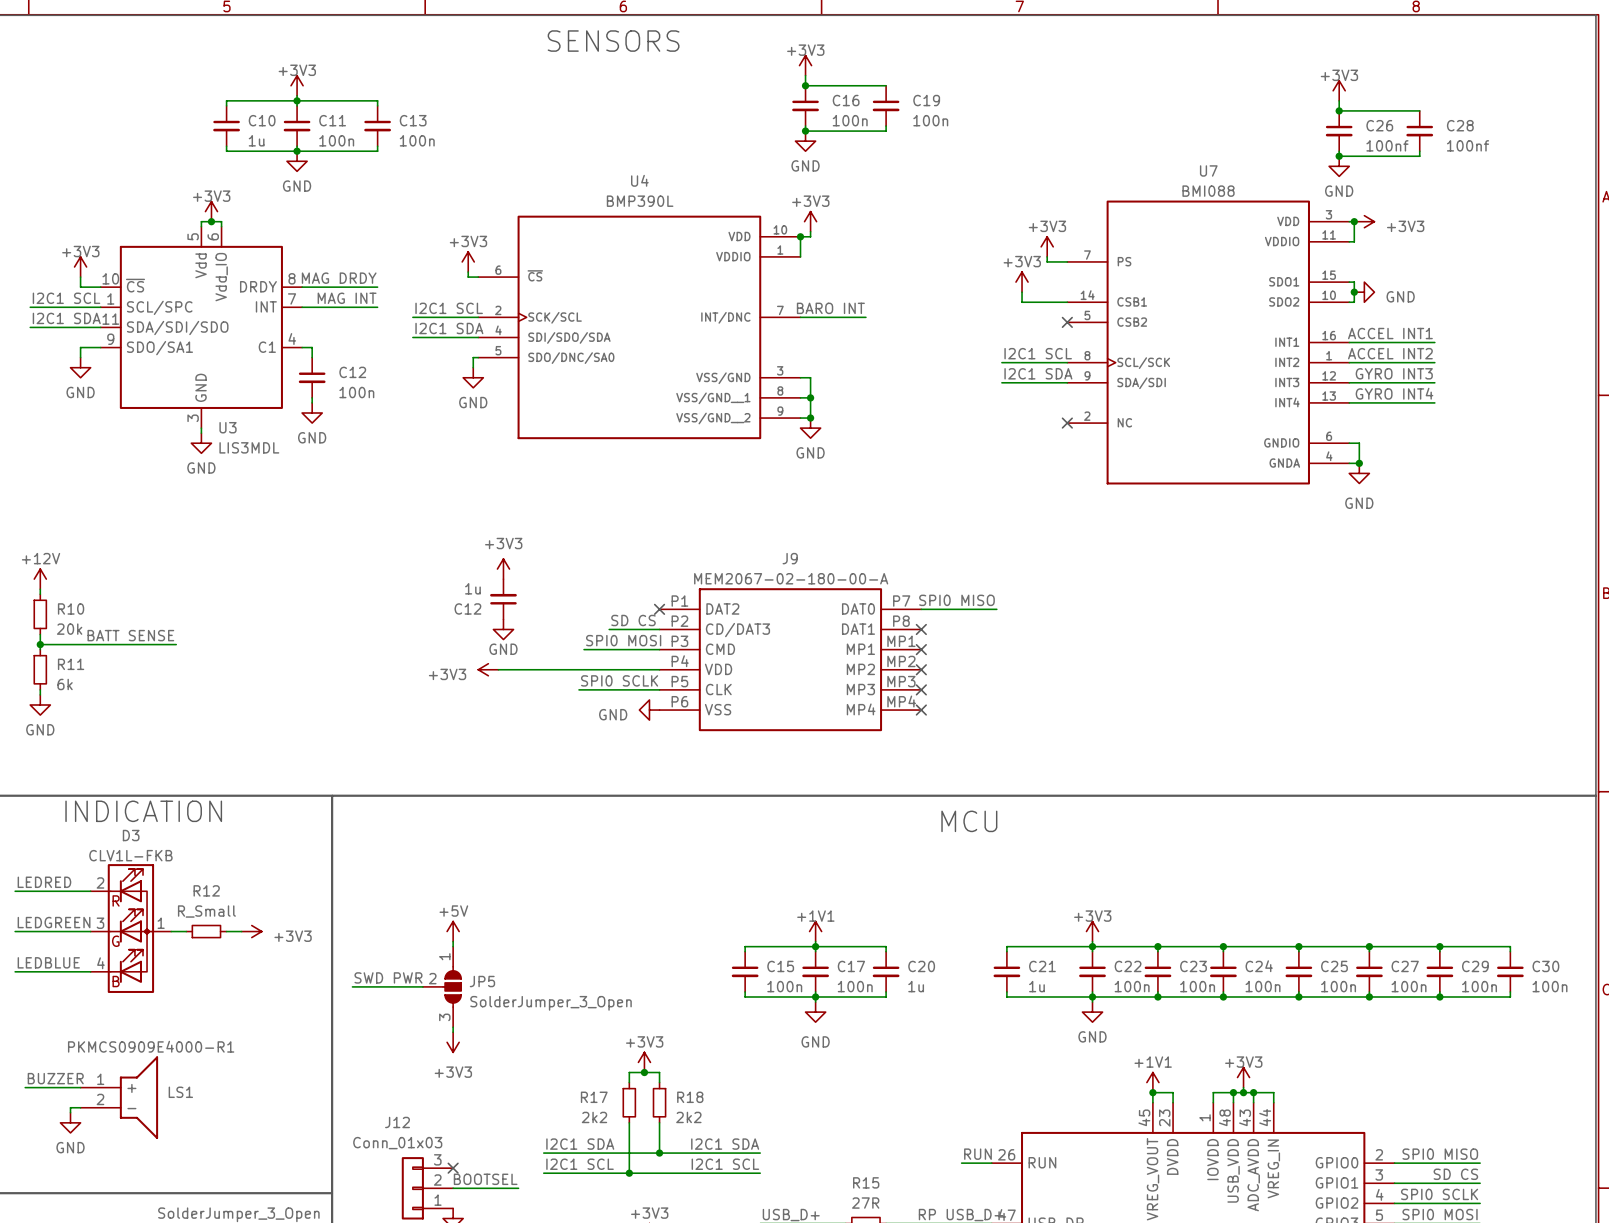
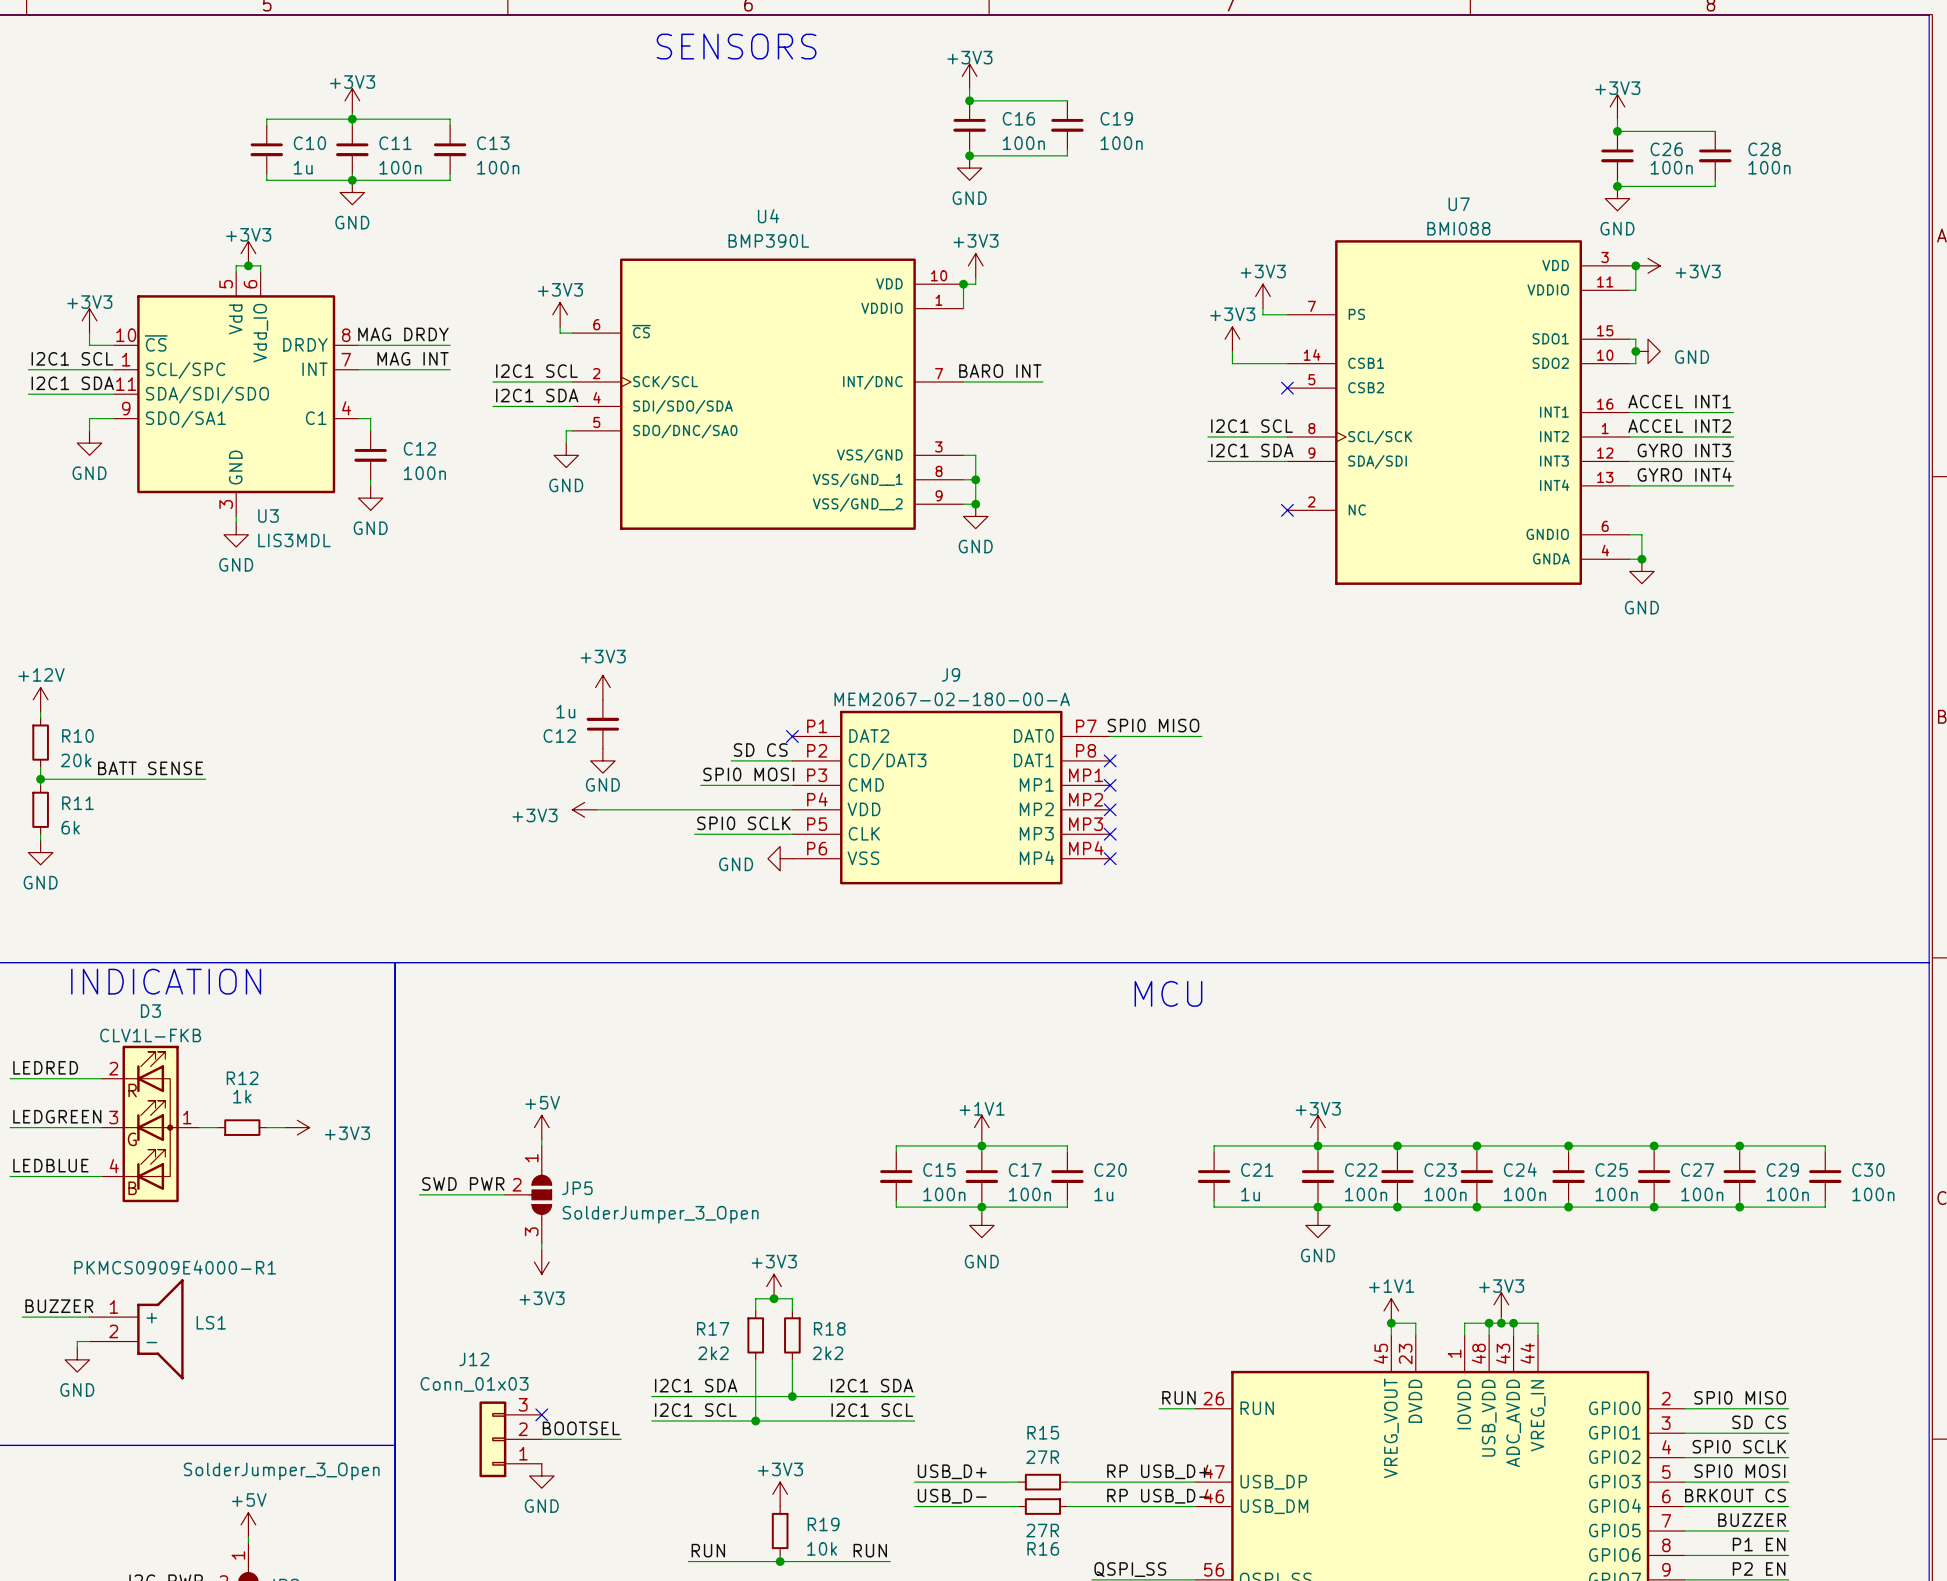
C26 value: 100nf (1387, 145) -> 100n (1671, 167)
C28 value: 100nf (1468, 145) -> 100n (1769, 167)
R12 value: R_Small (206, 911) -> 1k (242, 1096)

